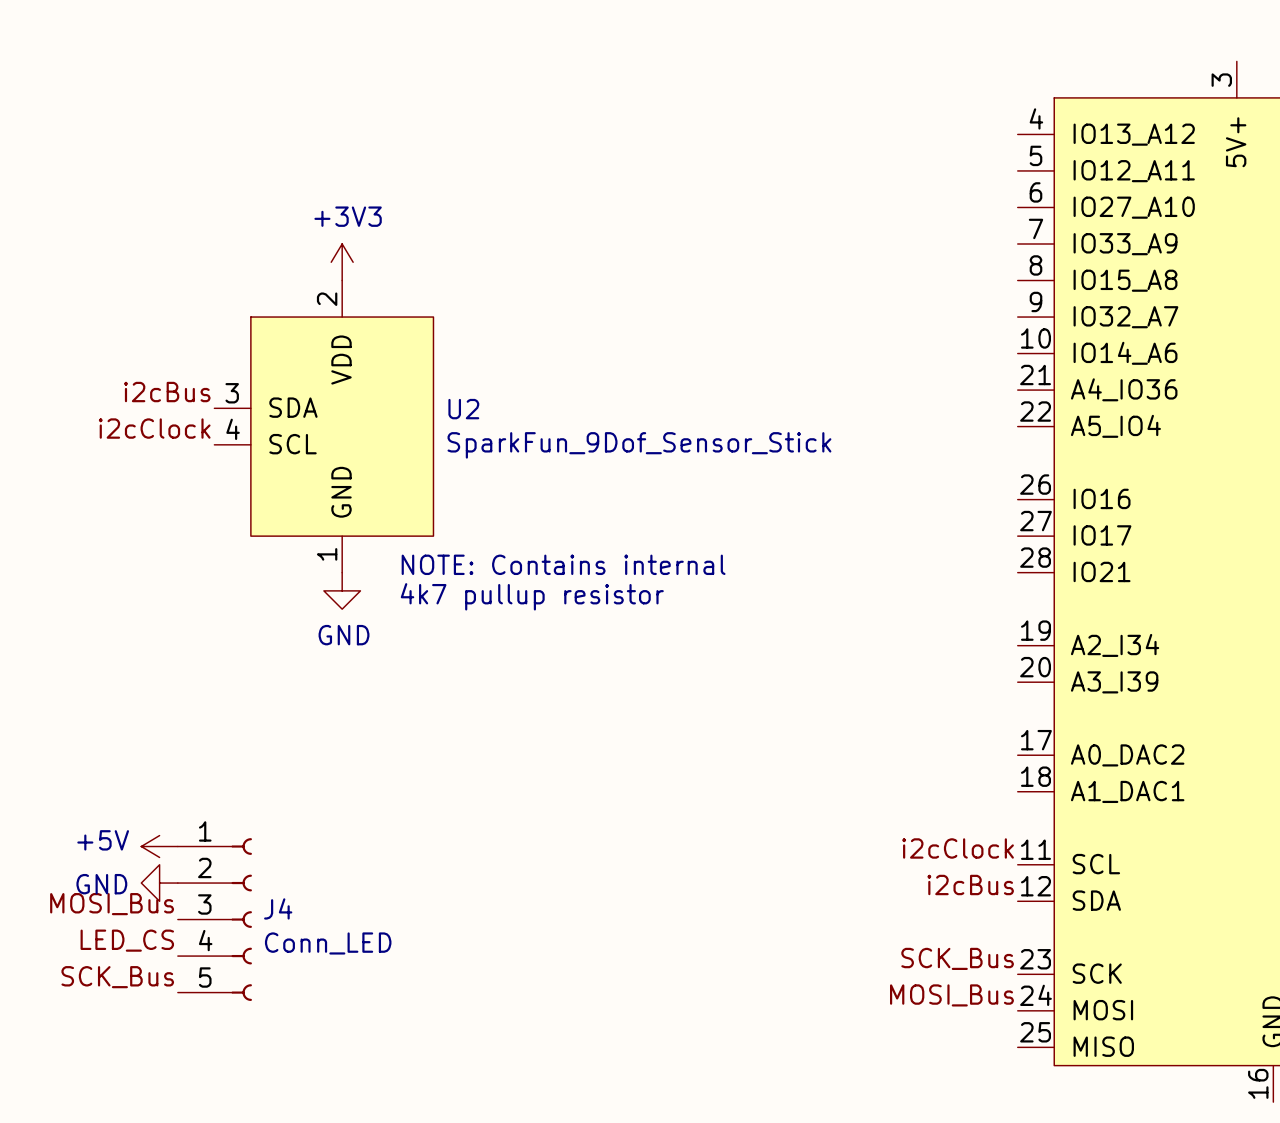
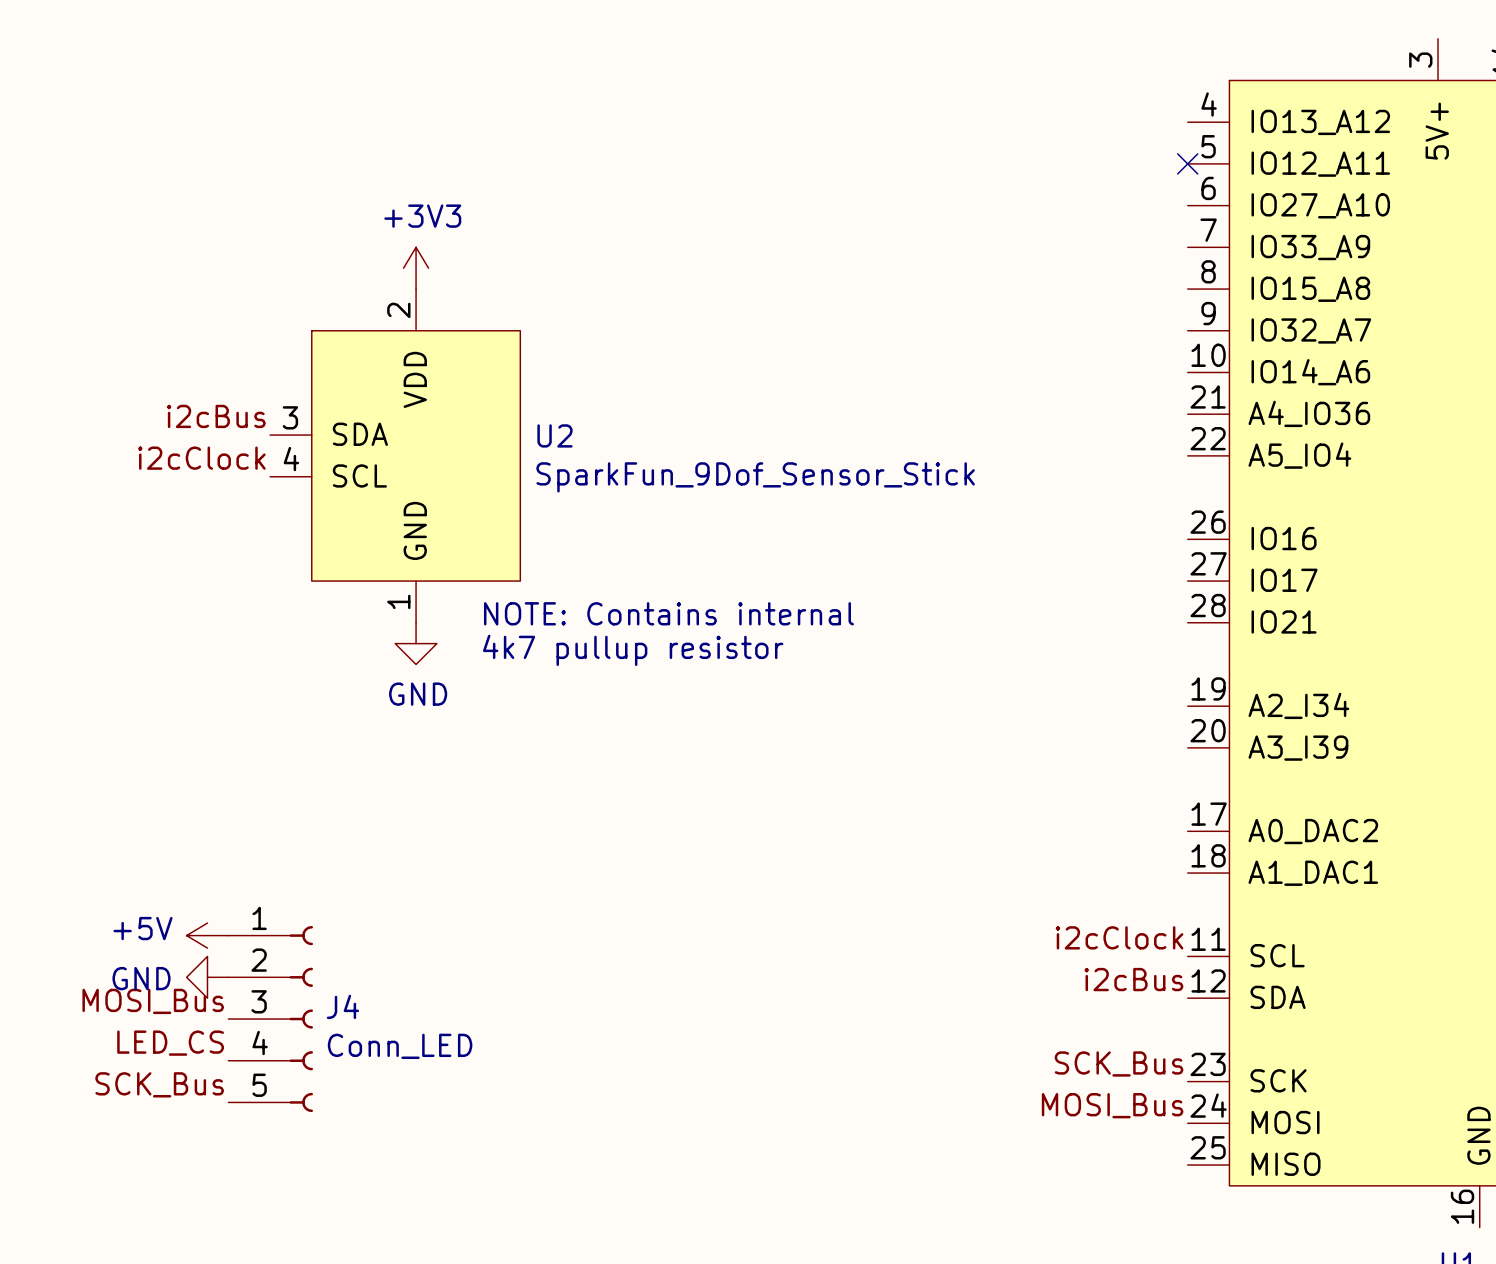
no-connect mark: none -> (1187, 163)

